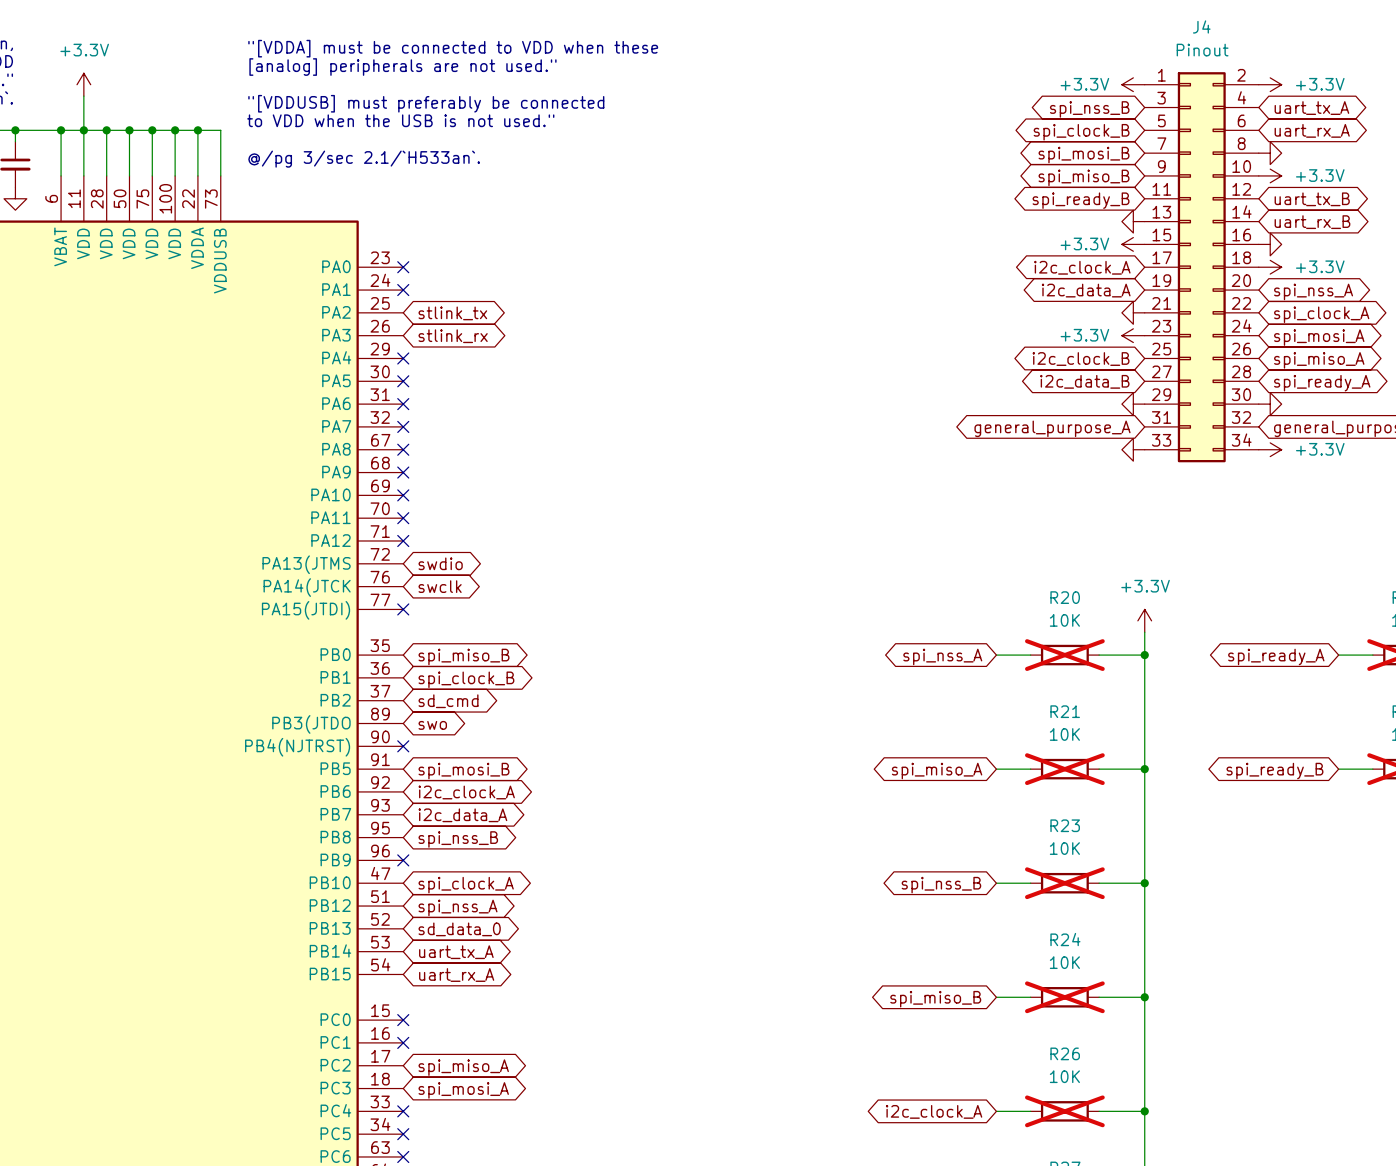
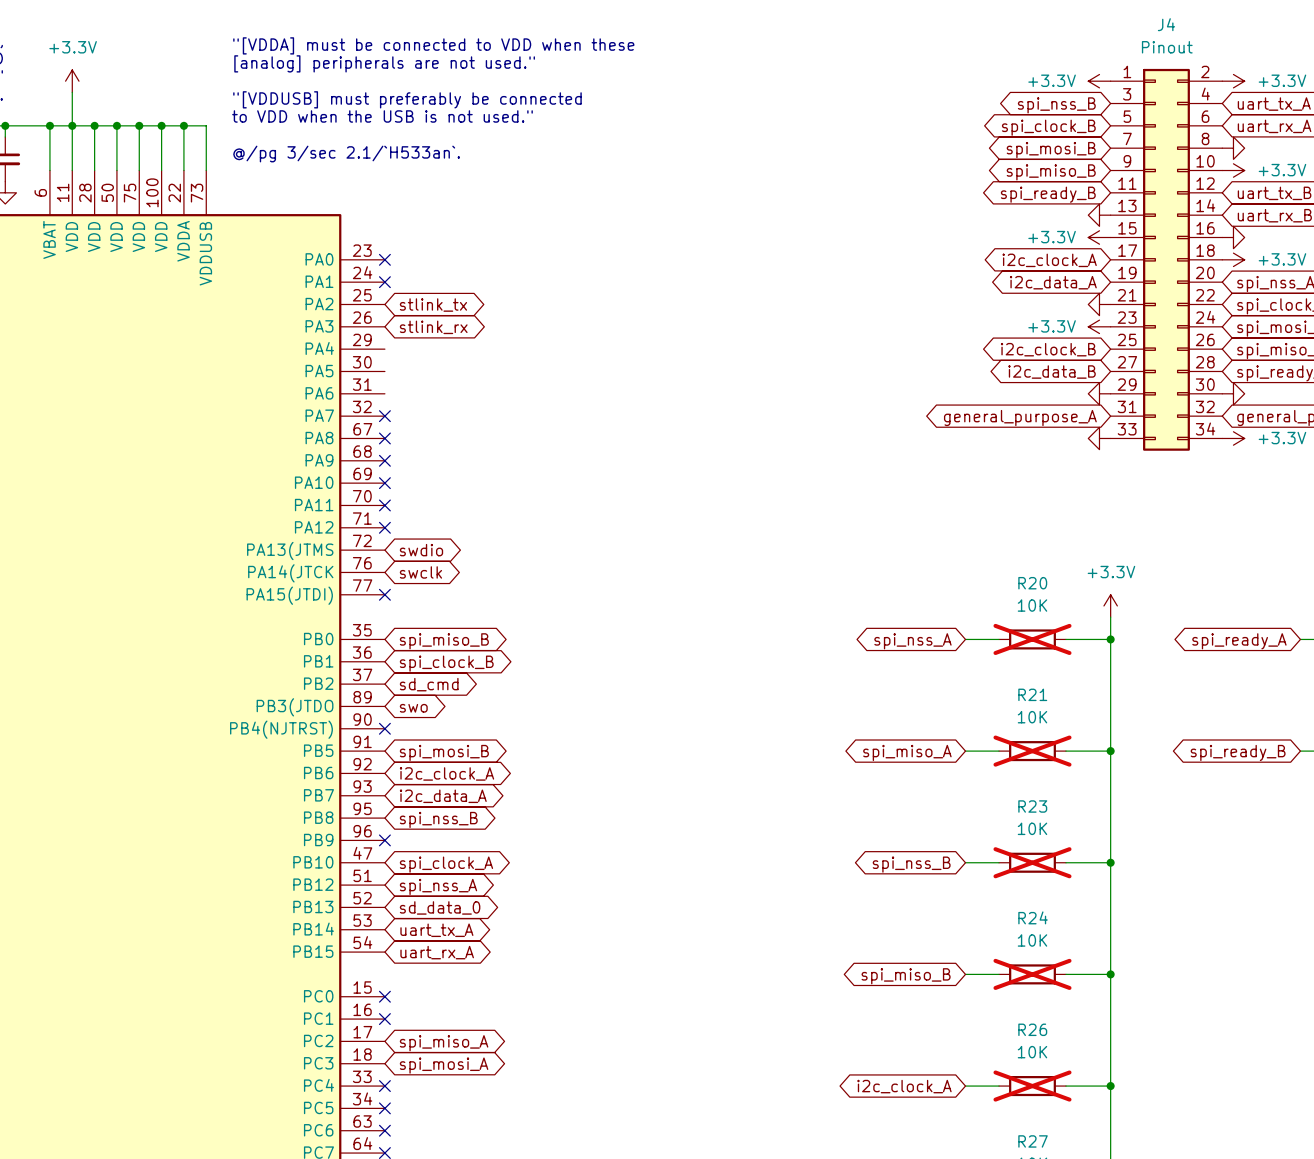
no-connect mark: (403, 358) -> none
no-connect mark: (403, 381) -> none
no-connect mark: (403, 404) -> none

